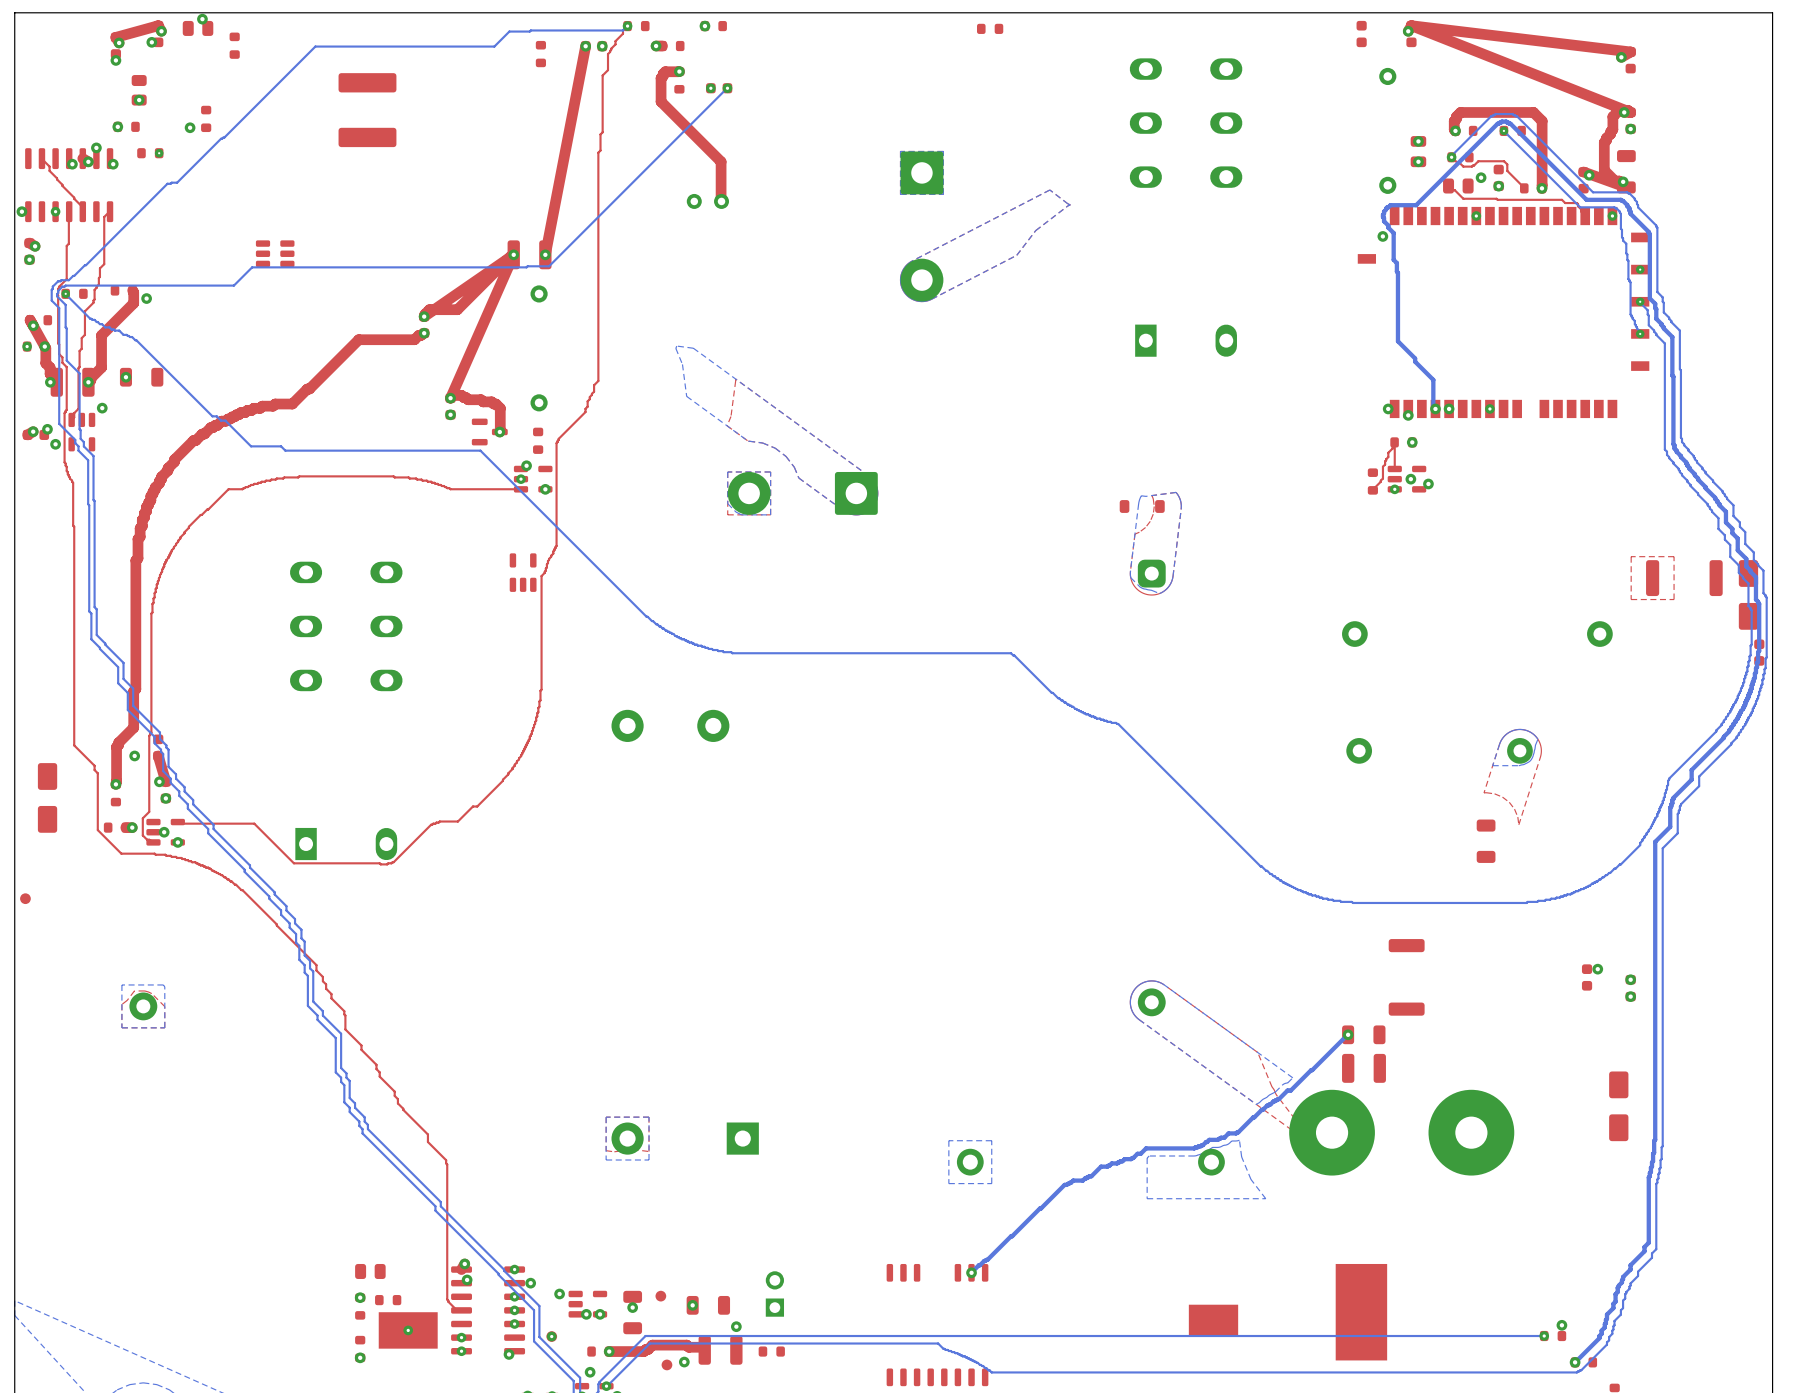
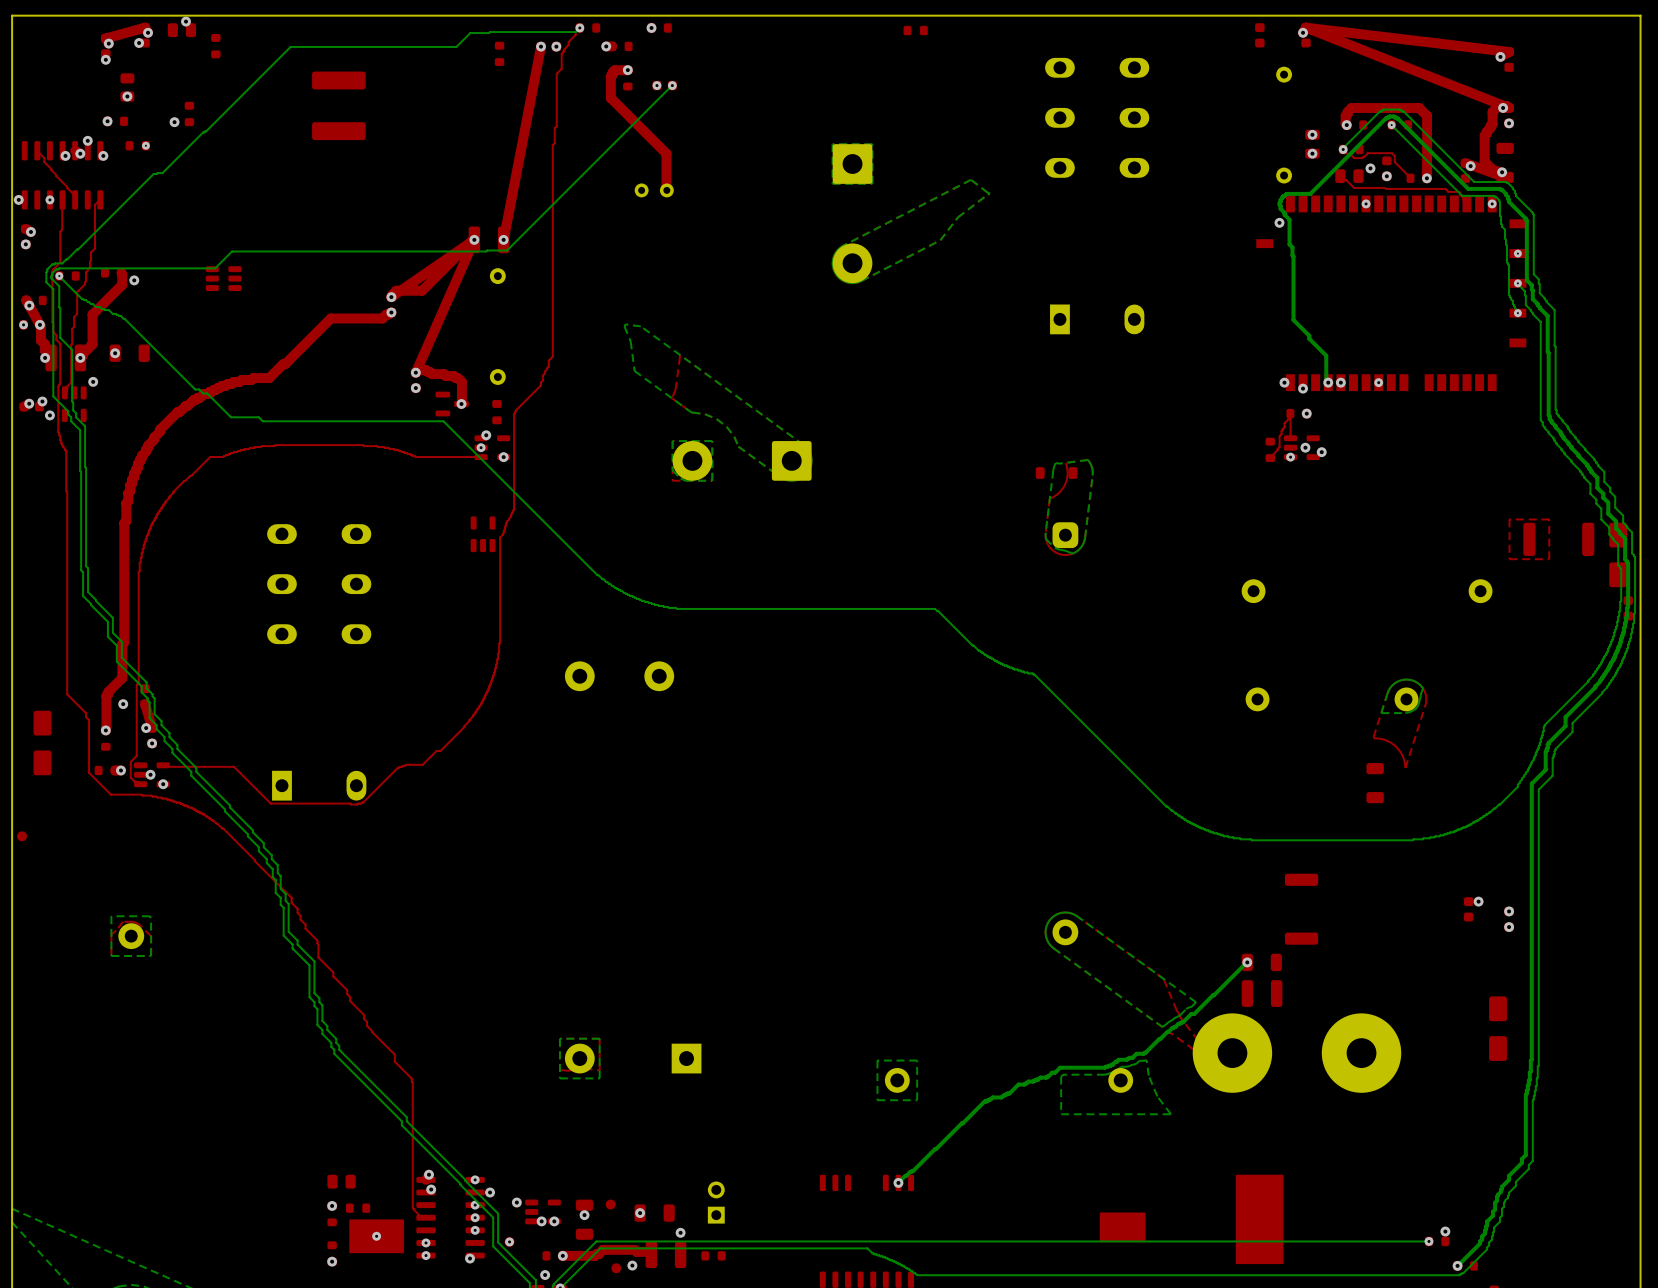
part position: (275, 253) -> (223, 278)

